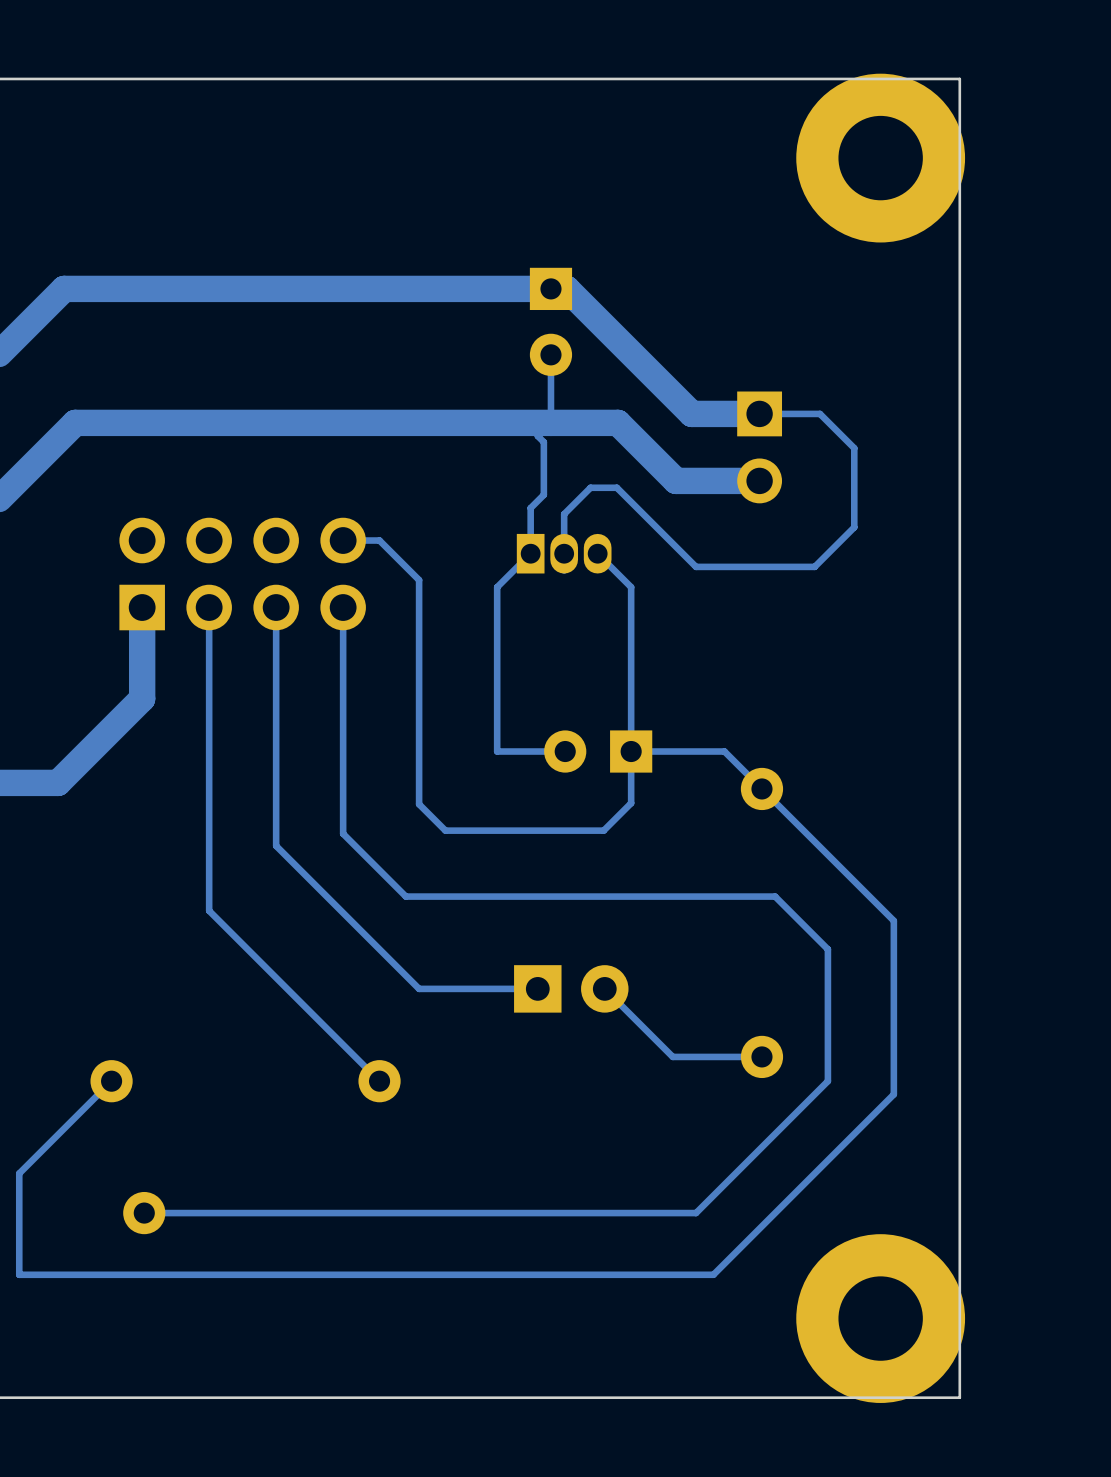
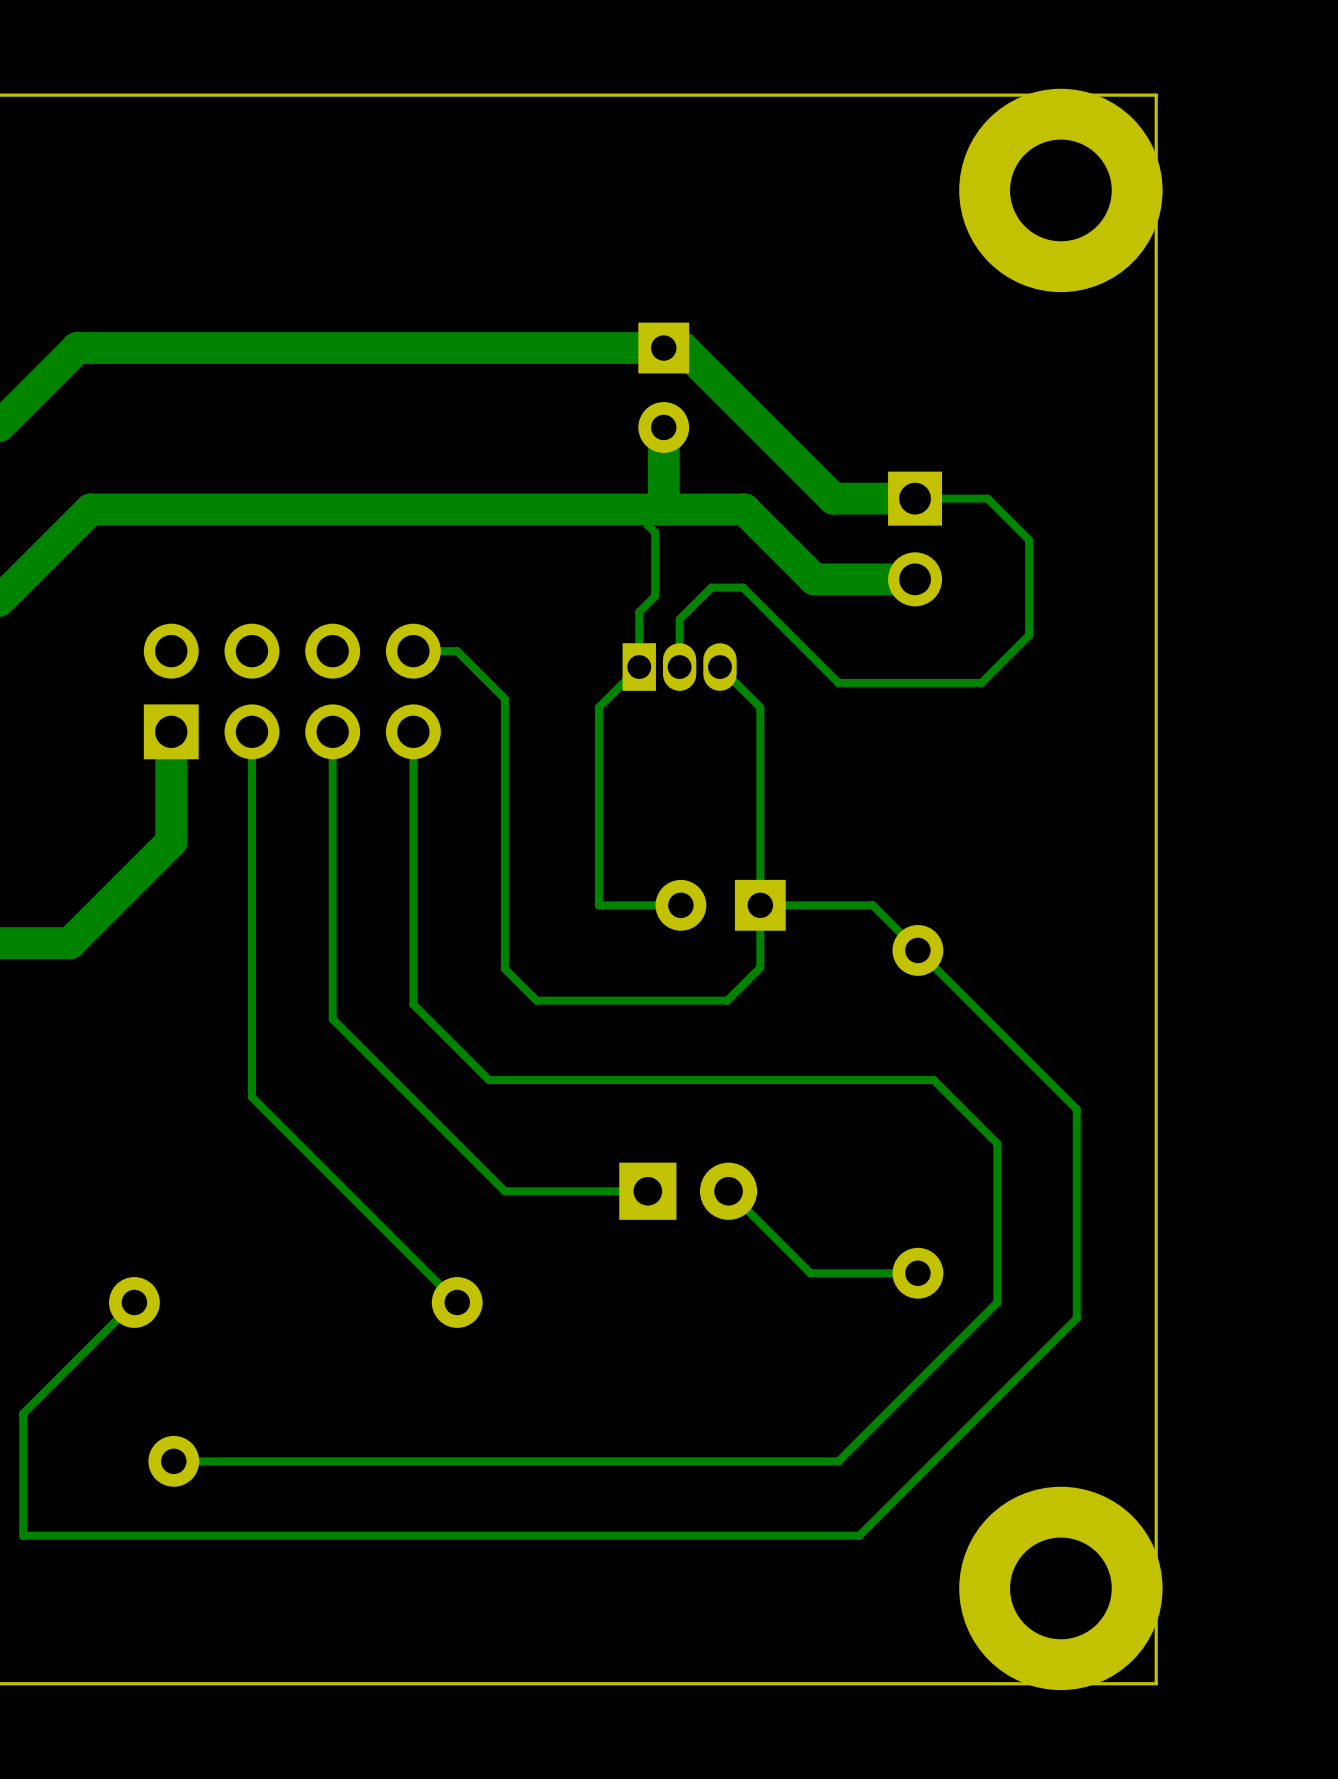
bottom track width: thin (550, 354) (550, 422) -> thick (663, 427) (663, 509)

